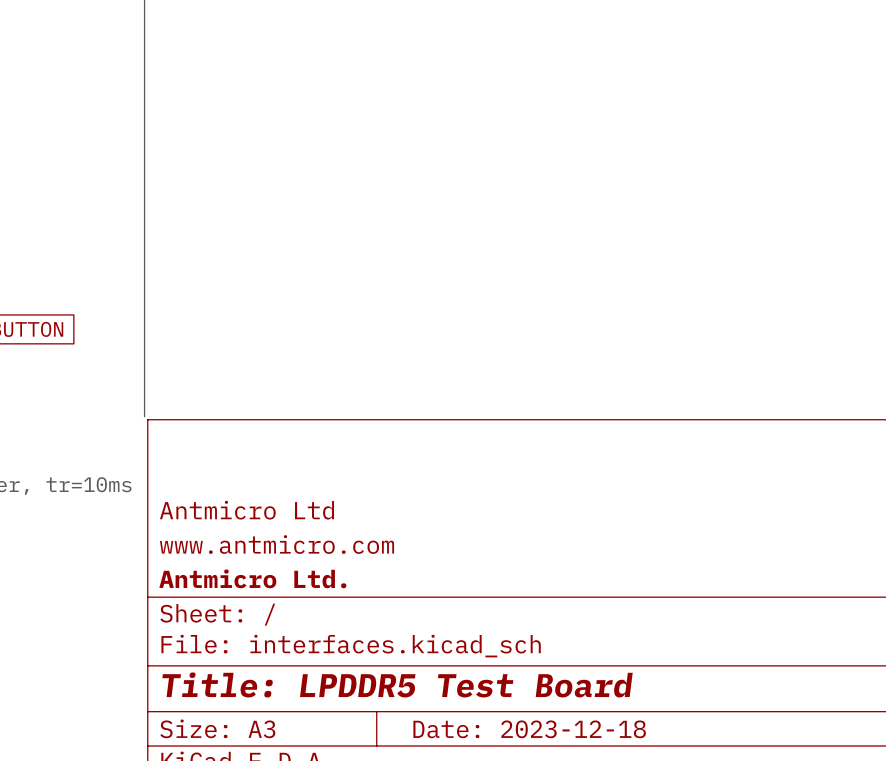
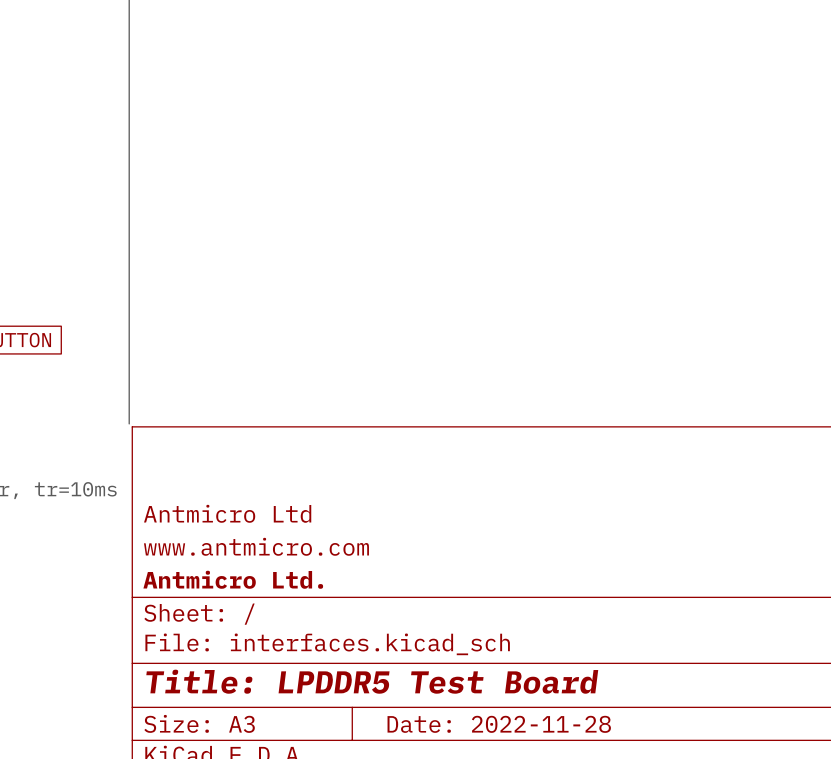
title block: Date: 2023-12-18 (529, 729) -> Date: 2022-11-28 (499, 724)

